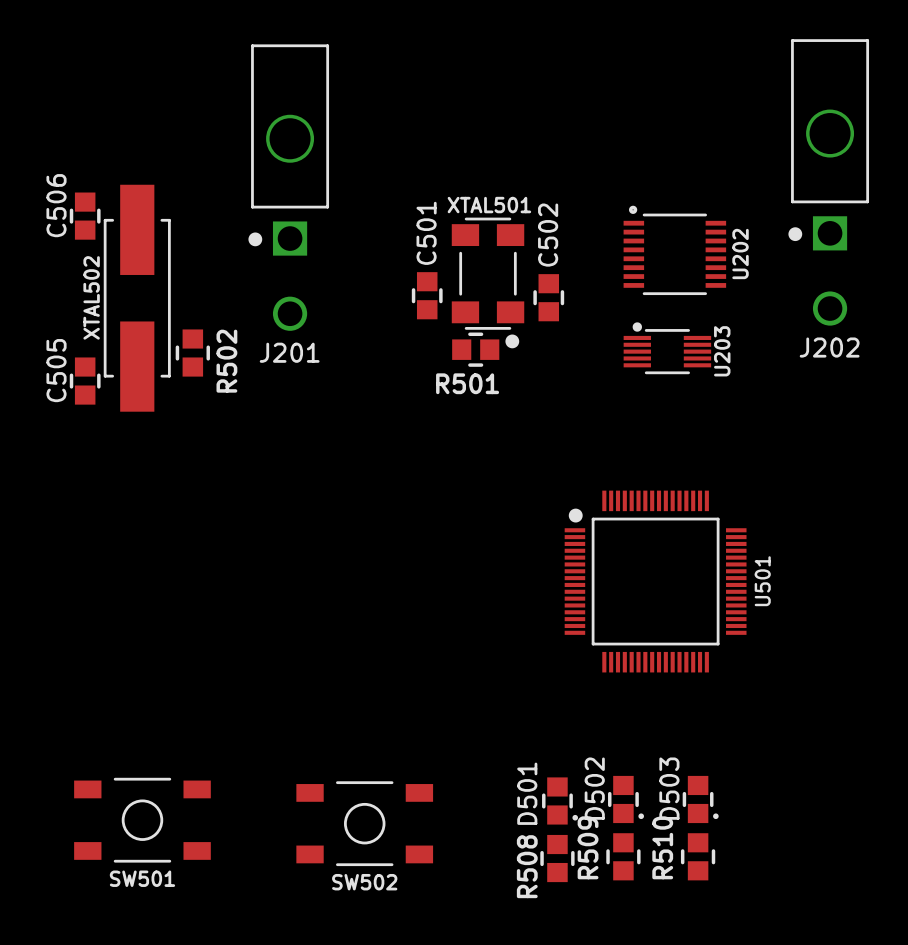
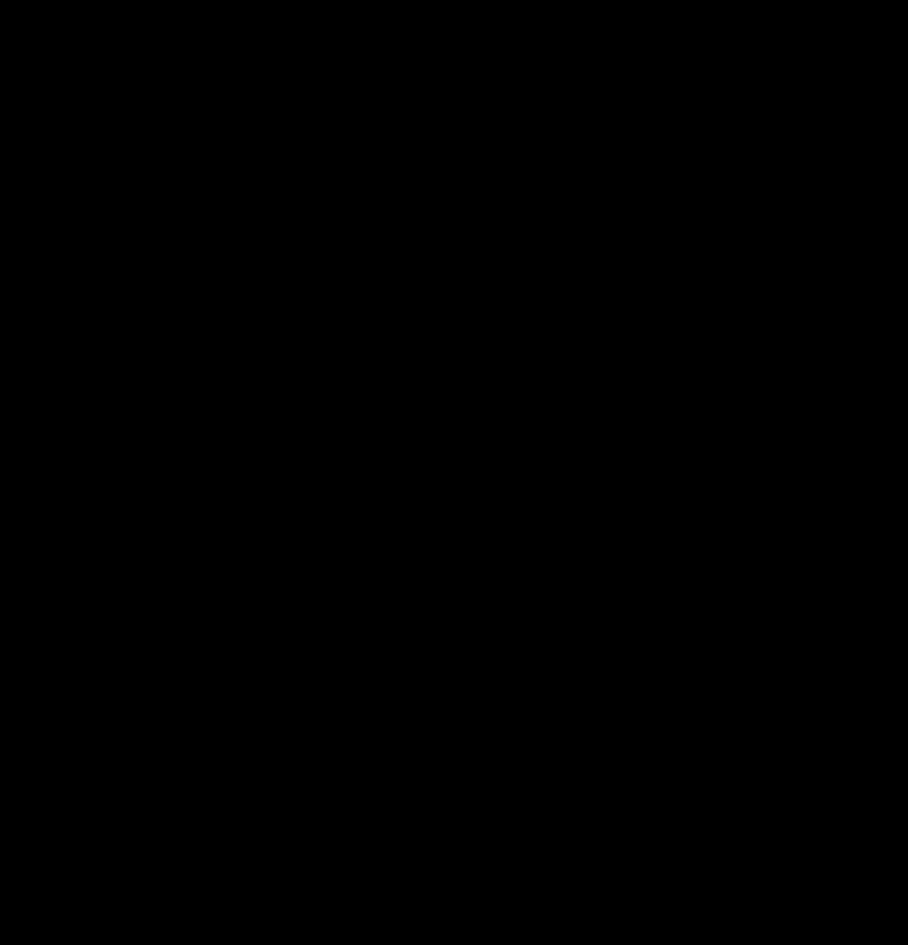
J202: (828, 182) -> none
J201: (288, 187) -> none
C506: (85, 216) -> none
U202: (674, 250) -> none
XTAL501: (488, 282) -> none
C501: (427, 295) -> none
C502: (548, 297) -> none
XTAL502: (137, 298) -> none
U203: (667, 348) -> none
R501: (475, 349) -> none
R502: (192, 353) -> none
C505: (85, 381) -> none
U501: (655, 581) -> none
D502: (626, 799) -> none
D503: (700, 799) -> none
D501: (560, 800) -> none
SW501: (142, 820) -> none
SW502: (364, 823) -> none
R509: (623, 856) -> none
R510: (698, 856) -> none
R508: (557, 858) -> none

